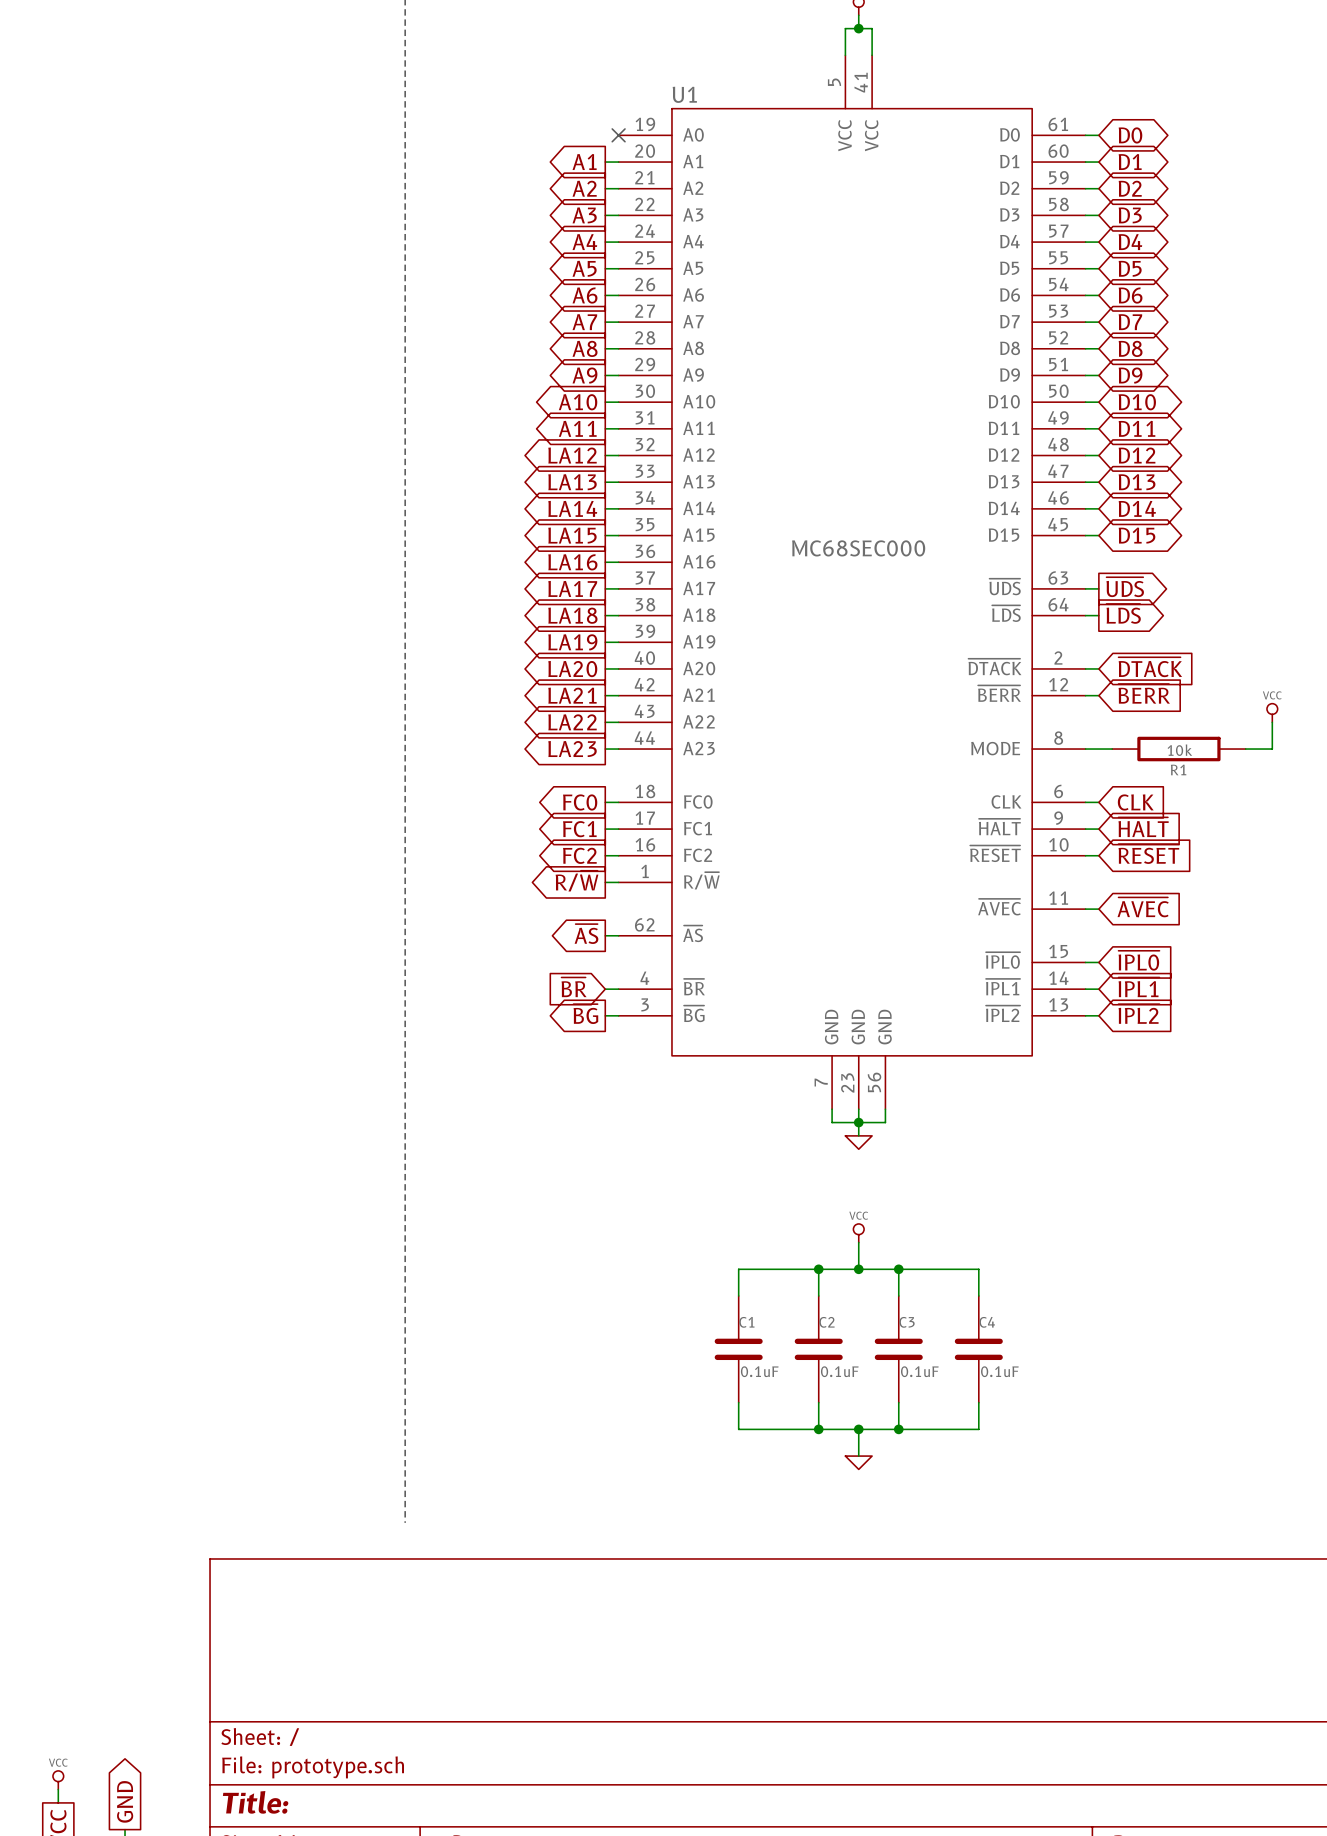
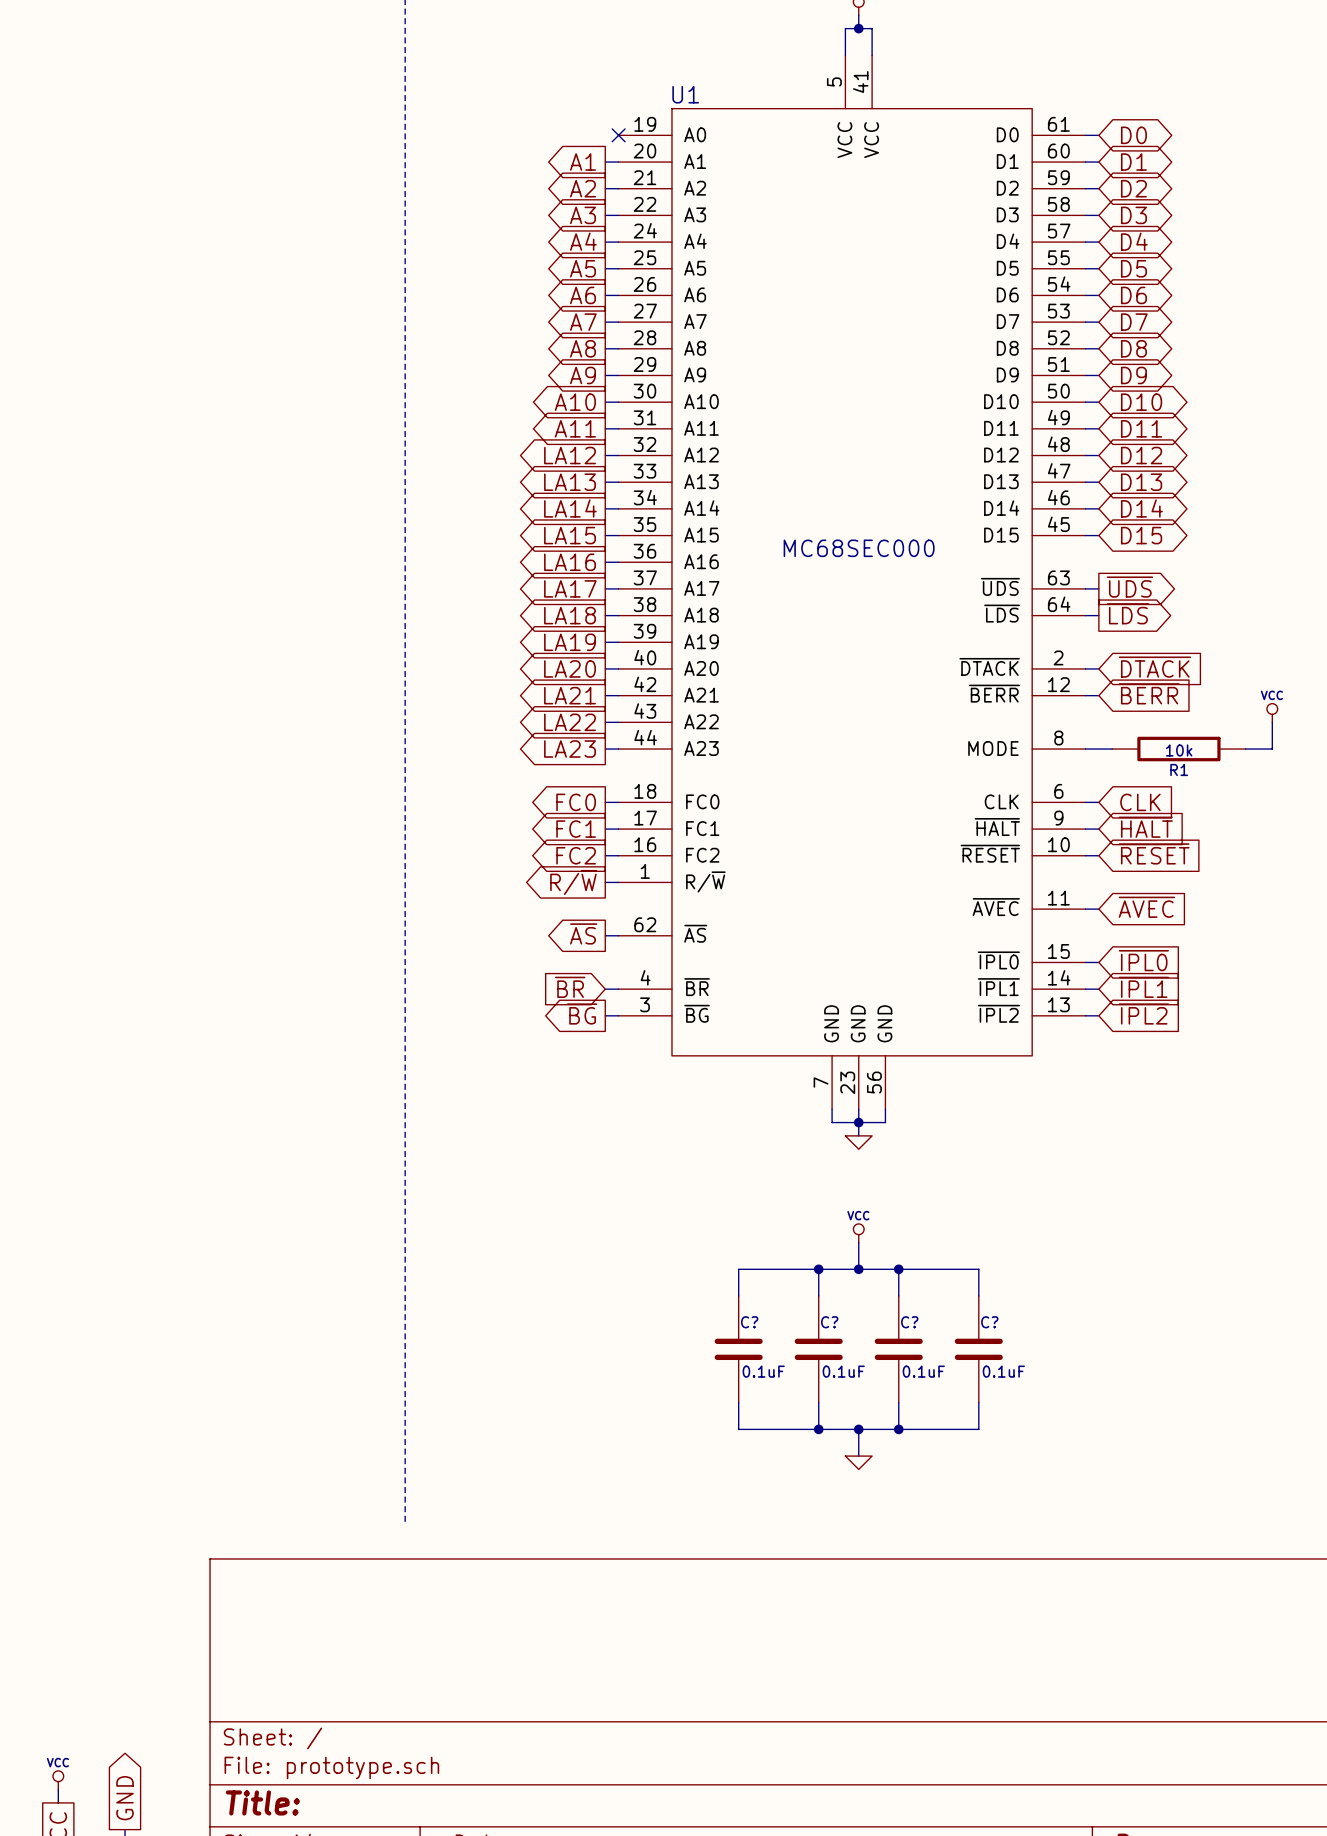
C1 name: C1 (746, 1322) -> C? (749, 1322)
C2 name: C2 (826, 1322) -> C? (829, 1322)
C3 name: C3 (907, 1322) -> C? (909, 1322)
C4 name: C4 (987, 1322) -> C? (989, 1322)

